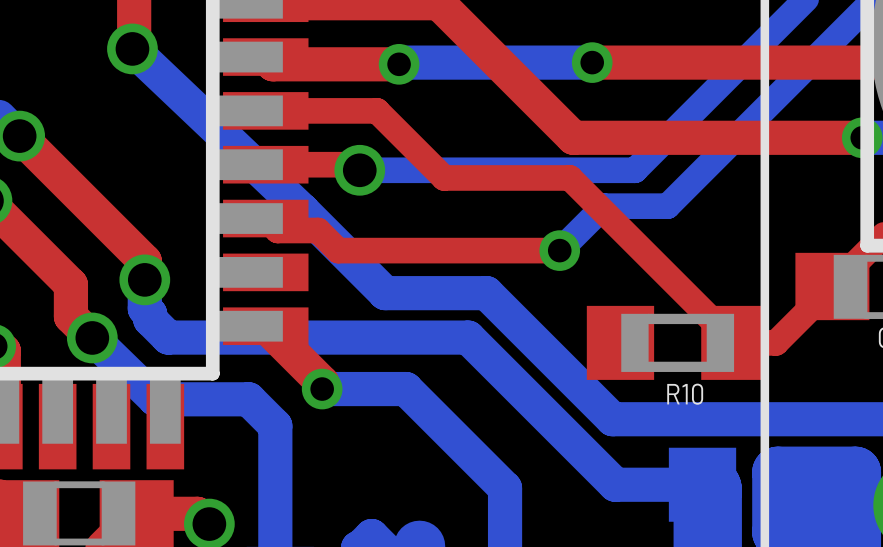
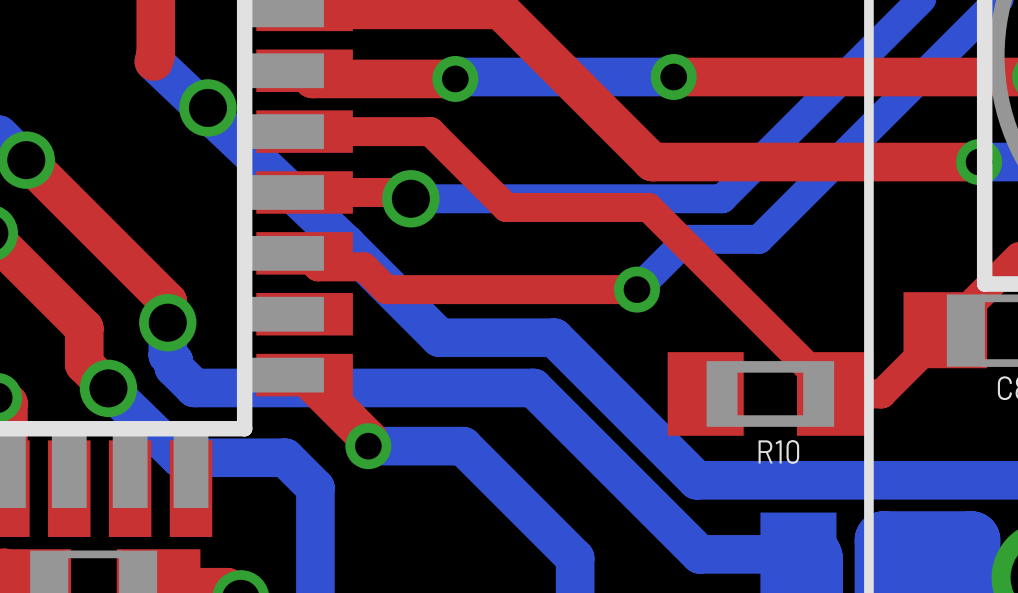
via position: (132, 48) -> (207, 107)

